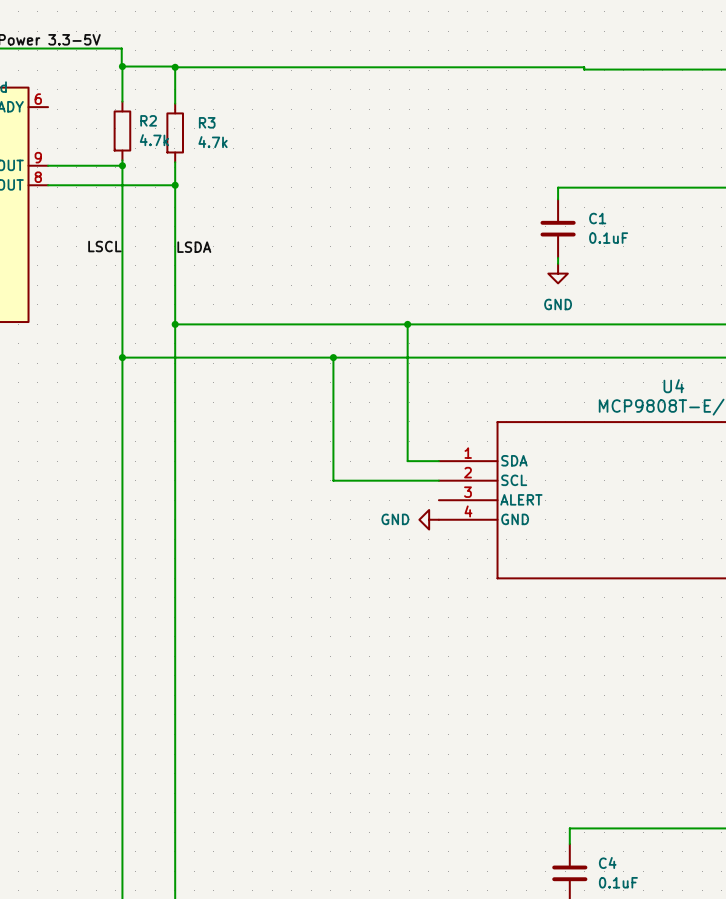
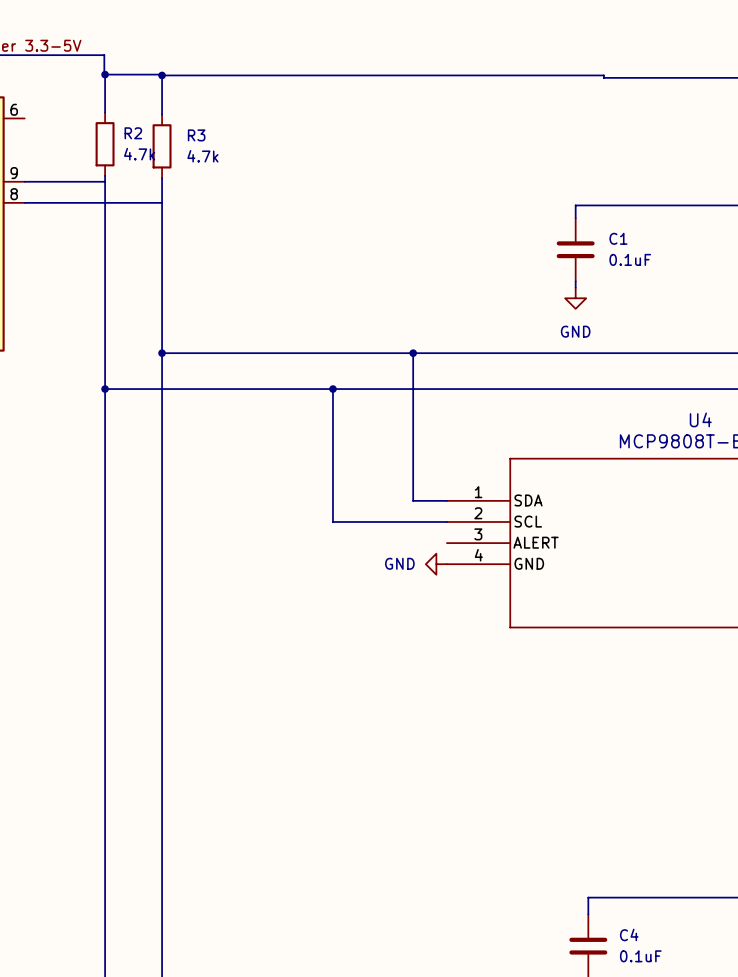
junction: (122, 165) -> none
junction: (175, 185) -> none
label: LSCL (104, 246) -> none
label: LSDA (194, 247) -> none

